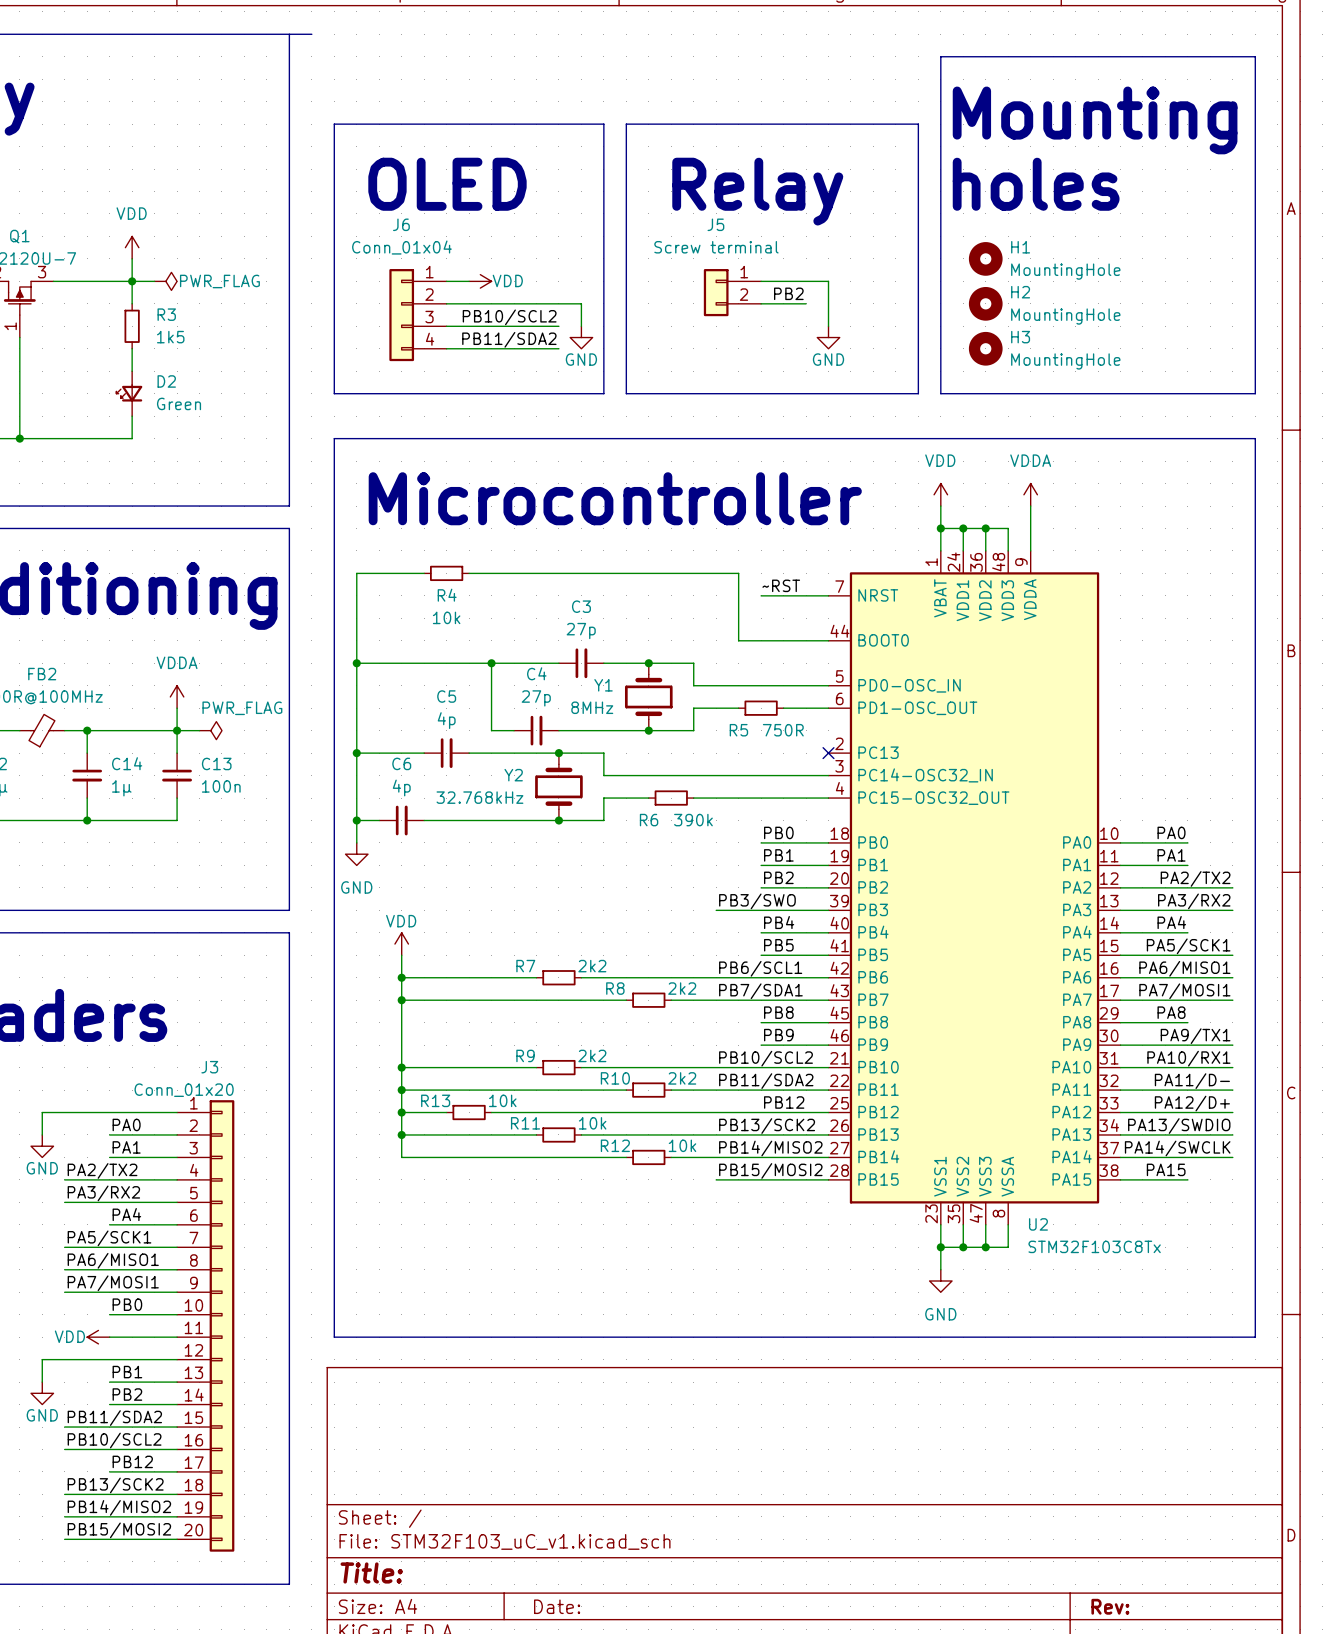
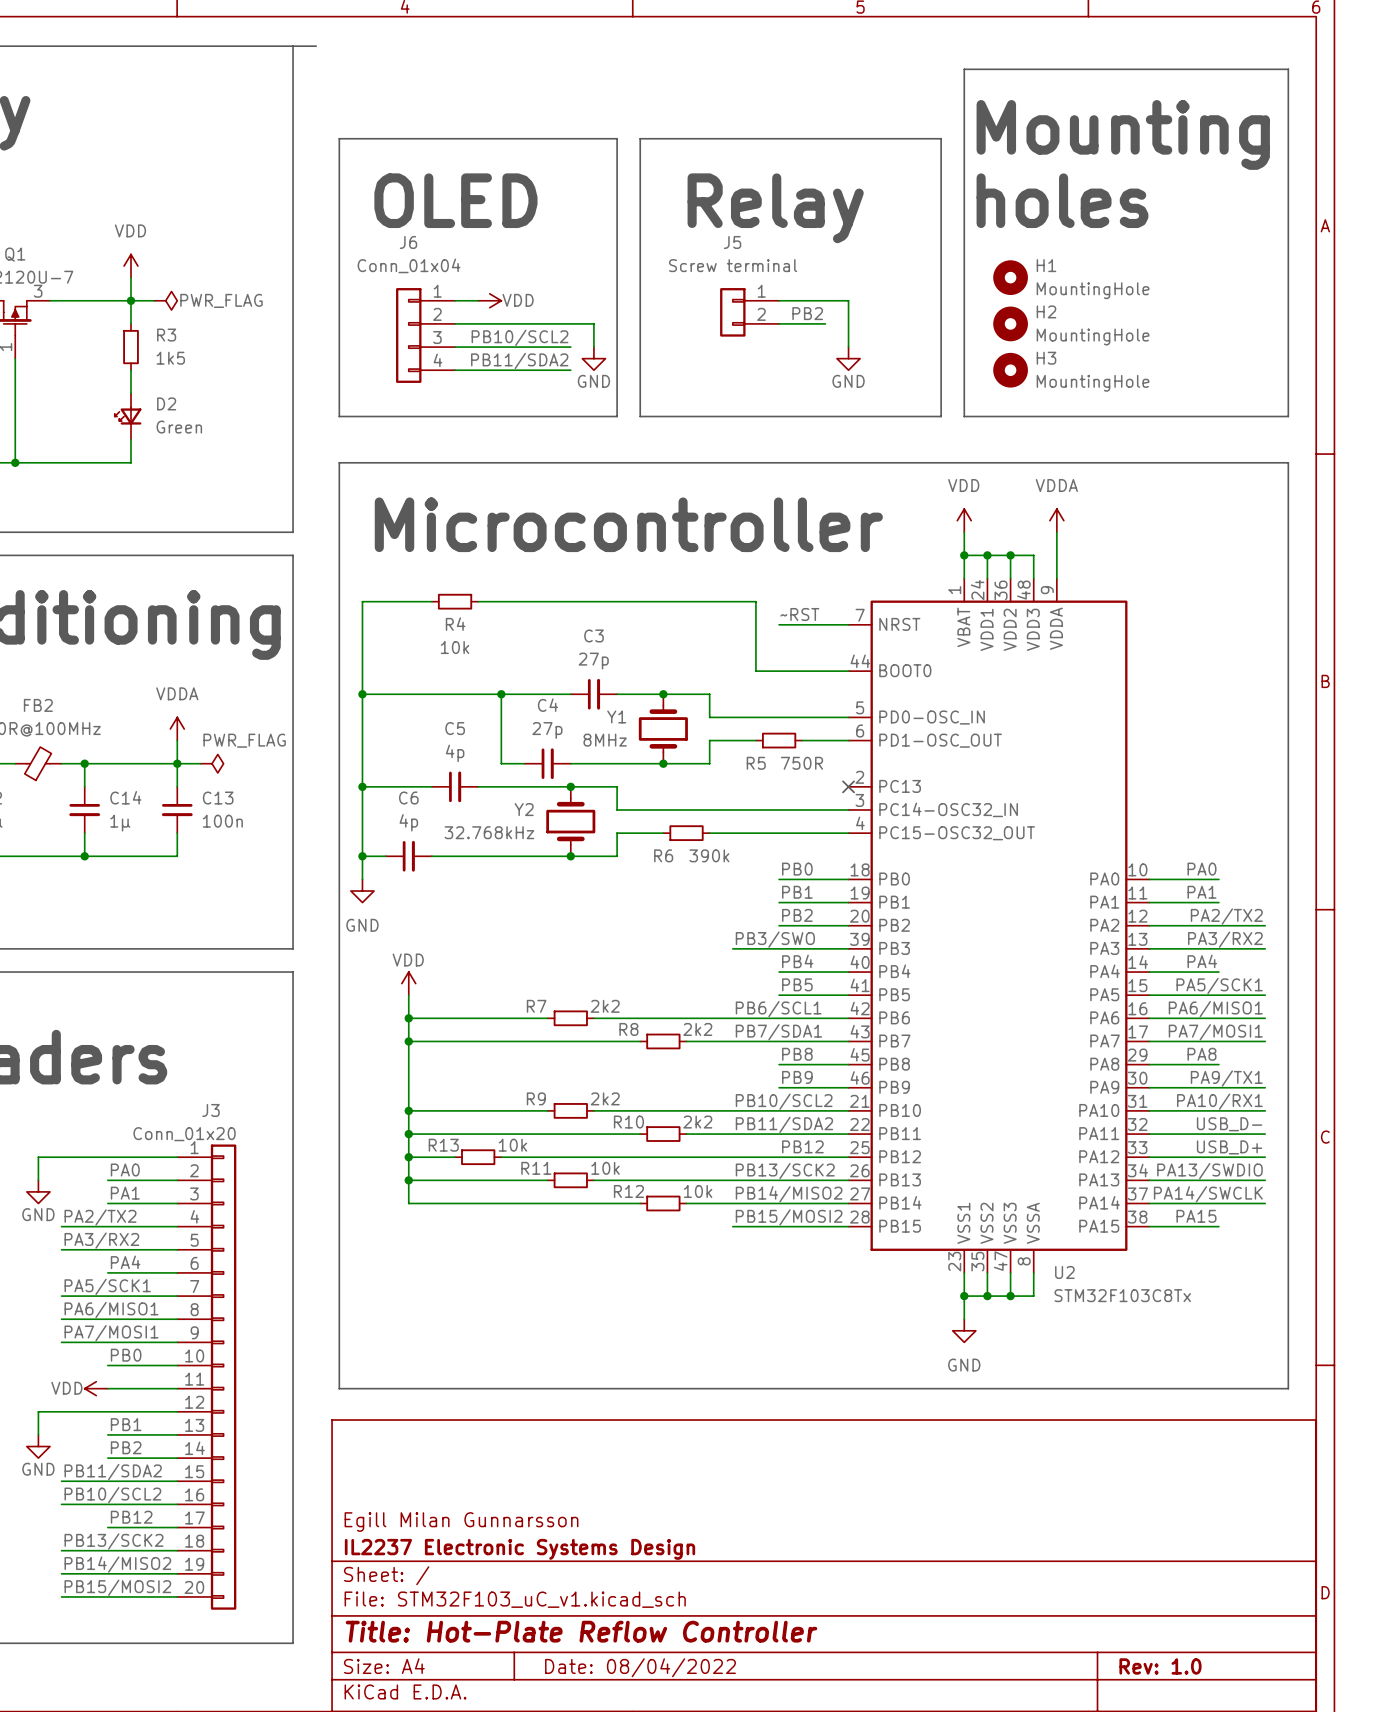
label: PA11/D- (1192, 1081) -> USB_D- (1229, 1124)
label: PA12/D+ (1192, 1103) -> USB_D+ (1229, 1147)
title block: none -> Egill Milan Gunnarsson (461, 1522)
title block: none -> IL2237 Electronic Systems Design (519, 1549)
title block: Title: (371, 1572) -> Title: Hot-Plate Reflow Controller (581, 1631)
title block: Date: (557, 1606) -> Date: 08/04/2022 (640, 1667)
title block: Rev: (1110, 1606) -> Rev: 1.0 (1160, 1666)

